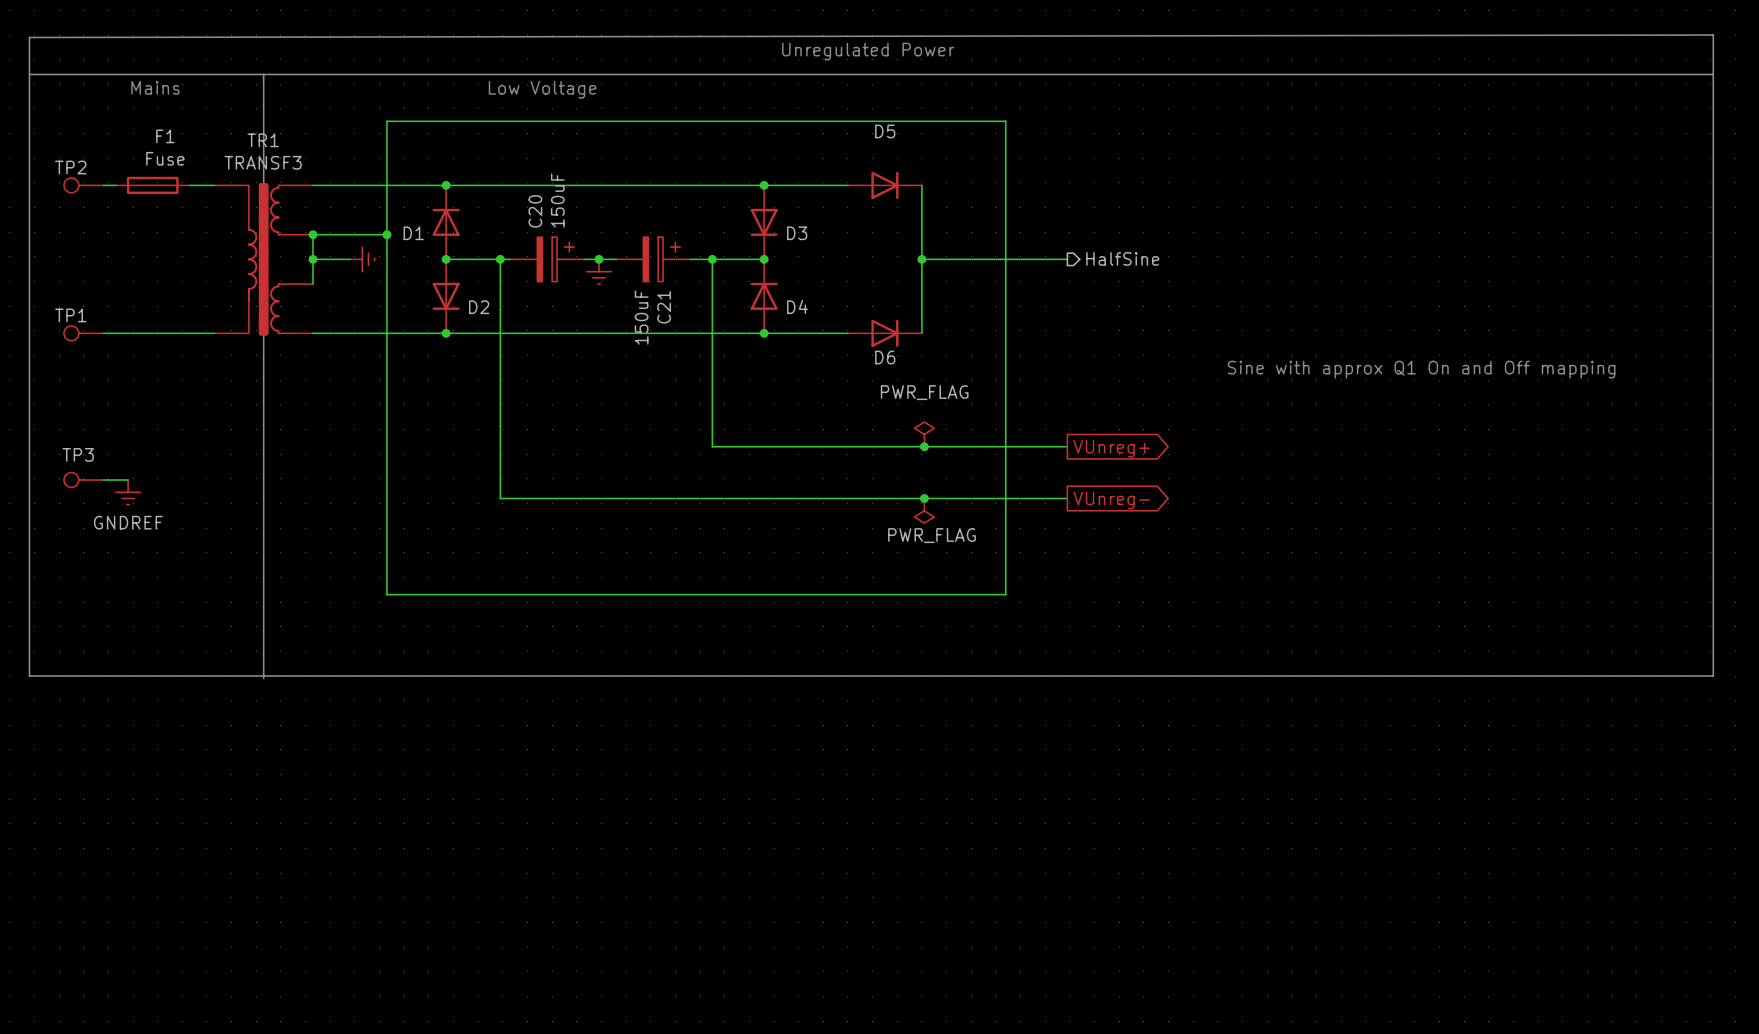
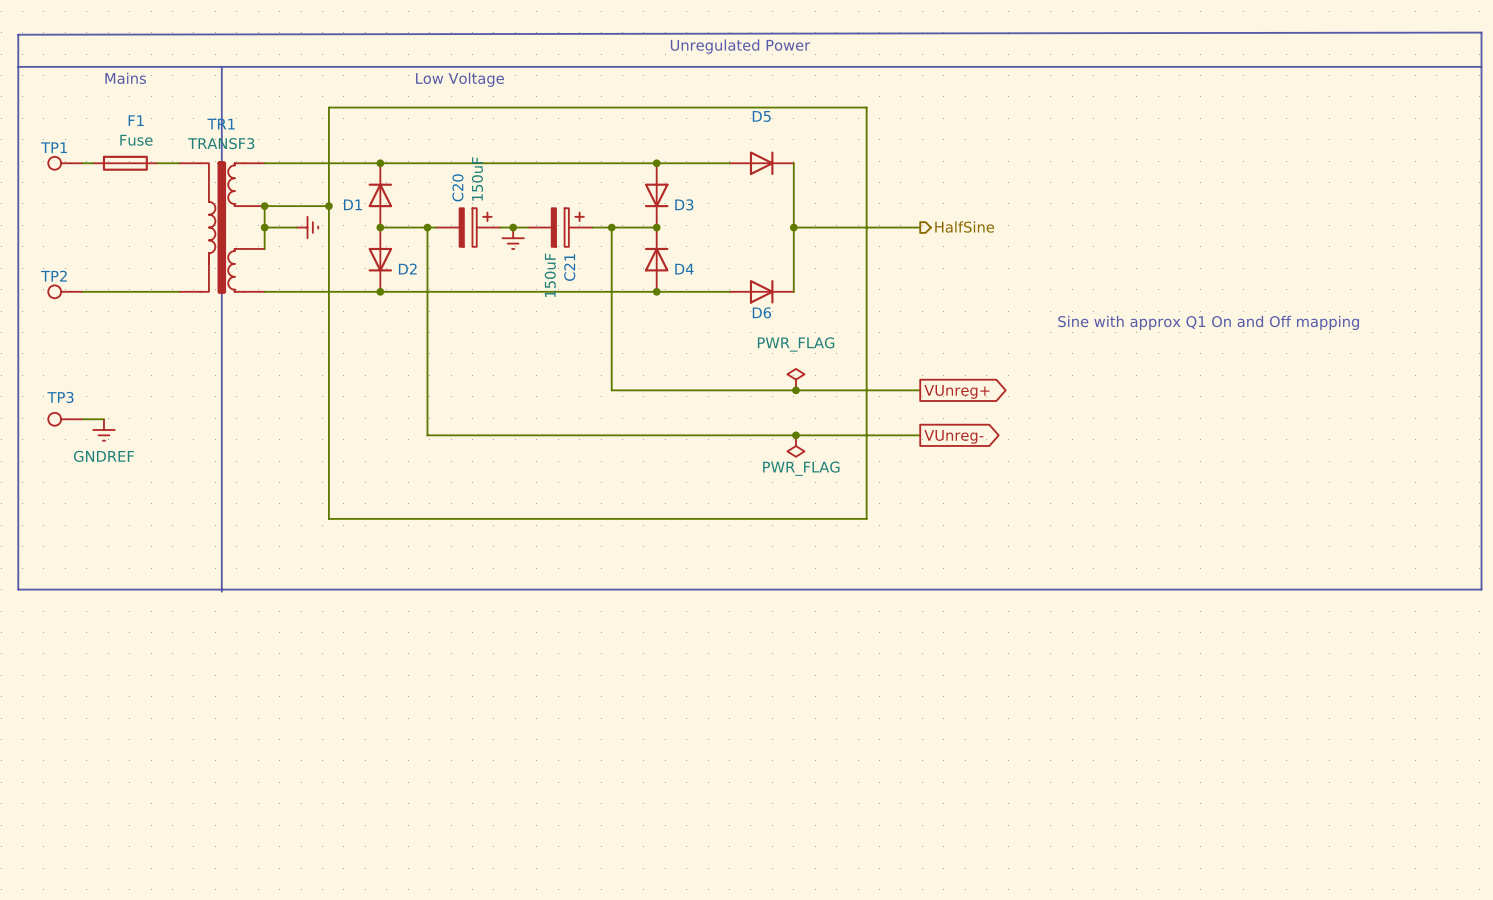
TP2 name: TP2 (70, 167) -> TP1 (54, 147)
TP1 name: TP1 (70, 315) -> TP2 (53, 276)

